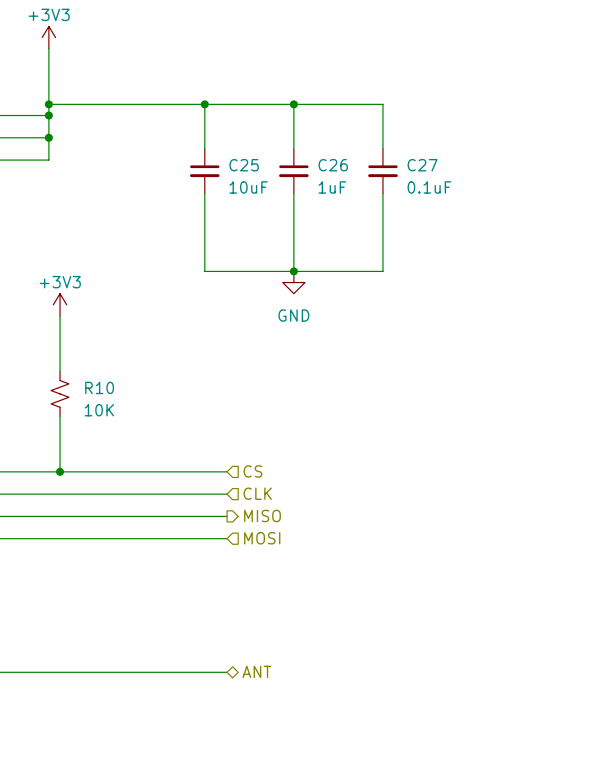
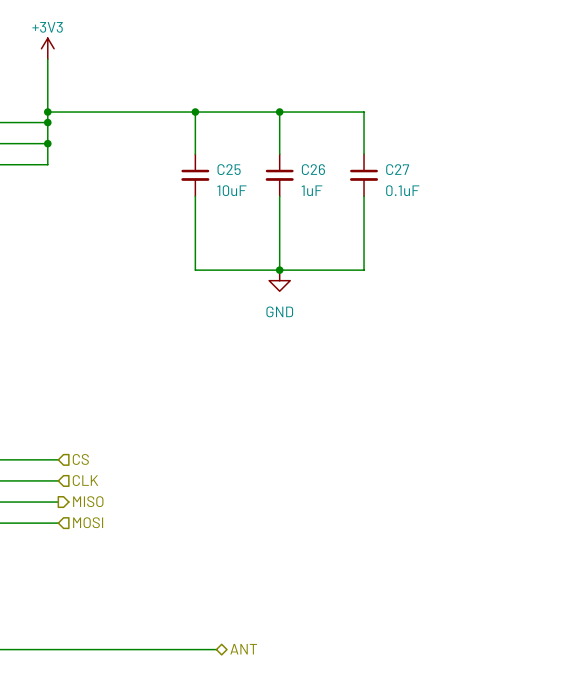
power symbol: +3V3 (60, 304) -> none
wire: (60, 315) (60, 371) -> none
R10: 10K (60, 393) -> none
wire: (60, 416) (60, 471) (227, 471) -> none
junction: (60, 471) -> none
hierarchical label position: CS (252, 471) -> CS (80, 459)
hierarchical label position: CLK (257, 493) -> CLK (85, 480)
wire: (60, 494) (227, 494) -> none
hierarchical label position: MISO (262, 515) -> MISO (88, 501)
wire: (60, 516) (227, 516) -> none
wire: (60, 538) (227, 538) -> none
hierarchical label position: MOSI (262, 538) -> MOSI (88, 522)

